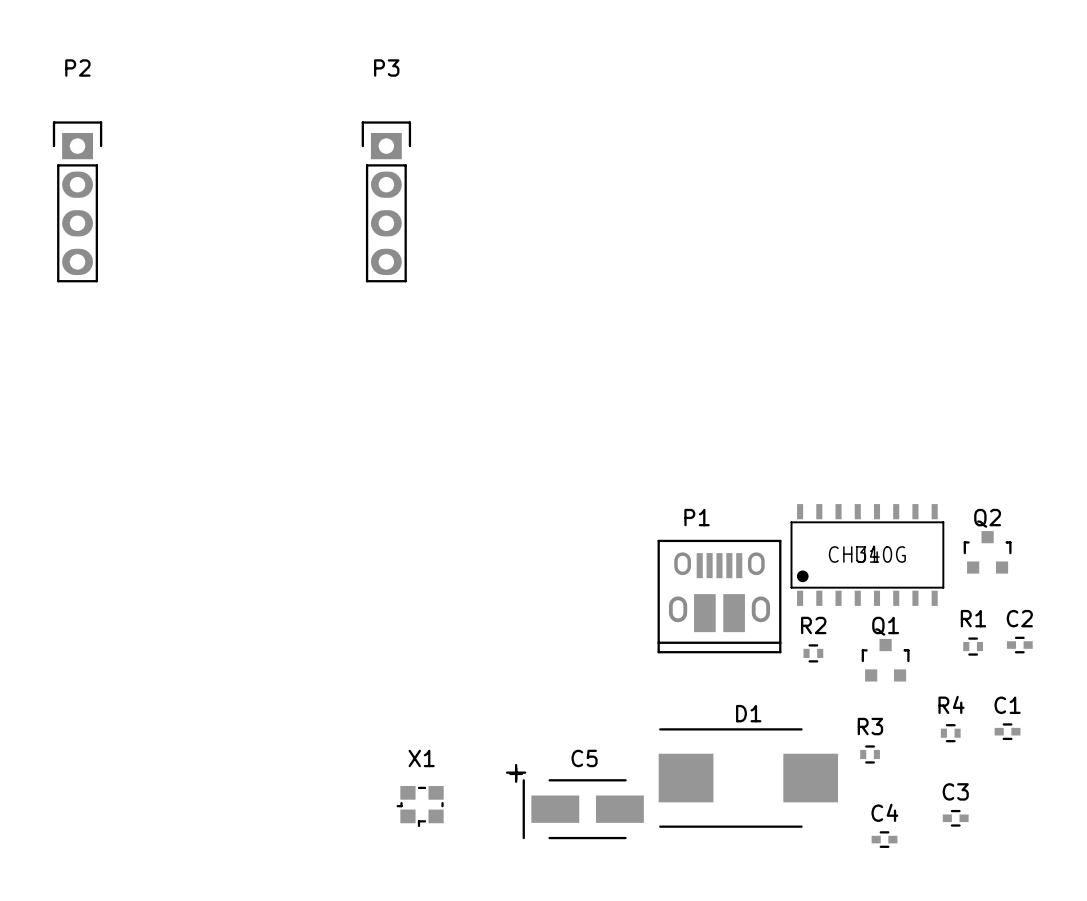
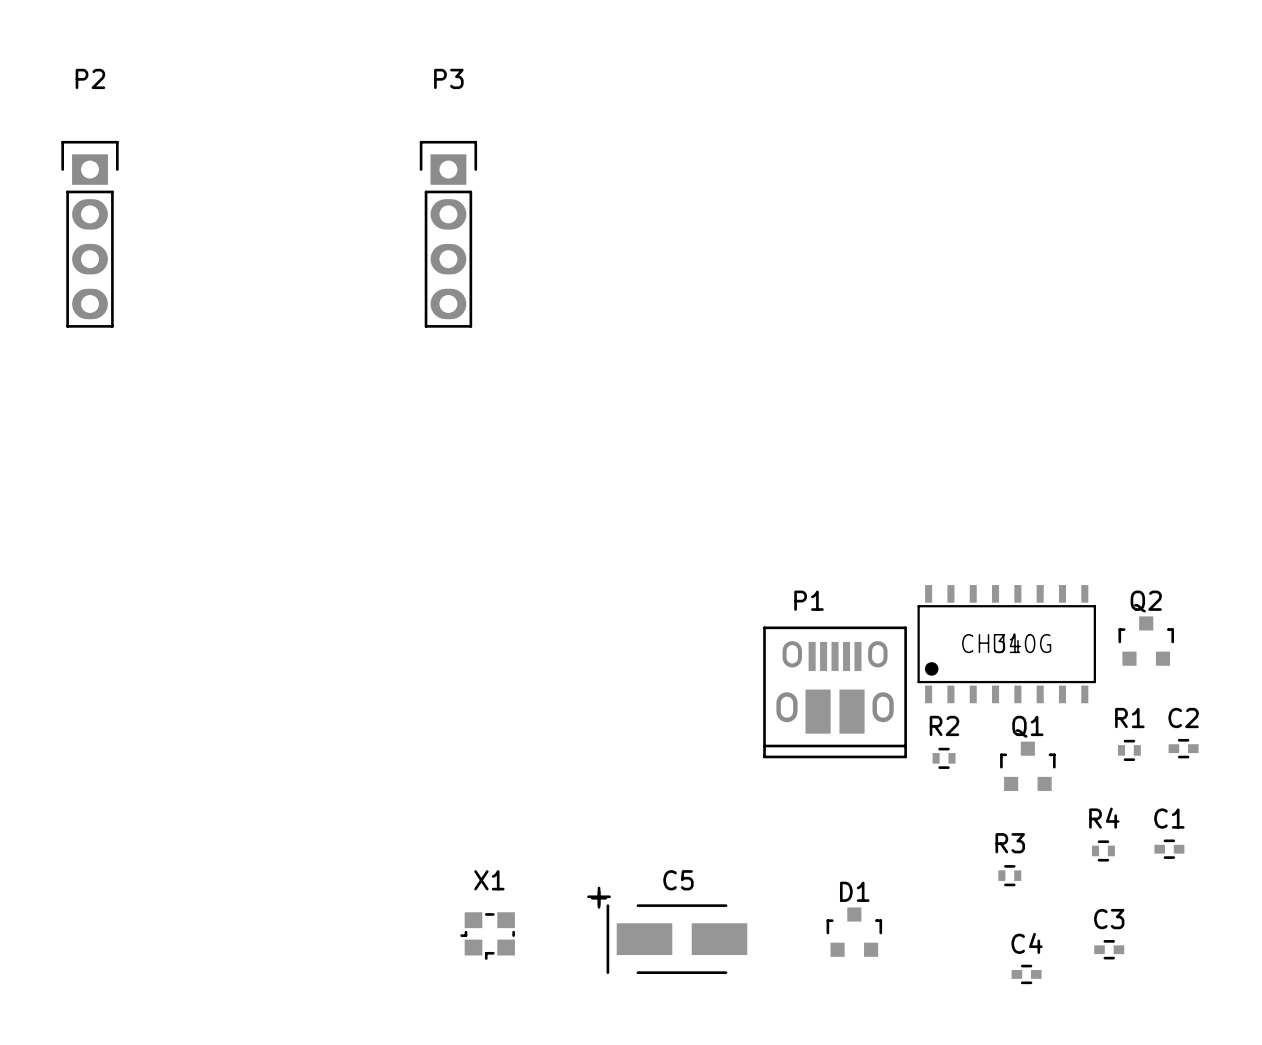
D1 footprint: [658, 728, 839, 828] -> [826, 907, 883, 957]

